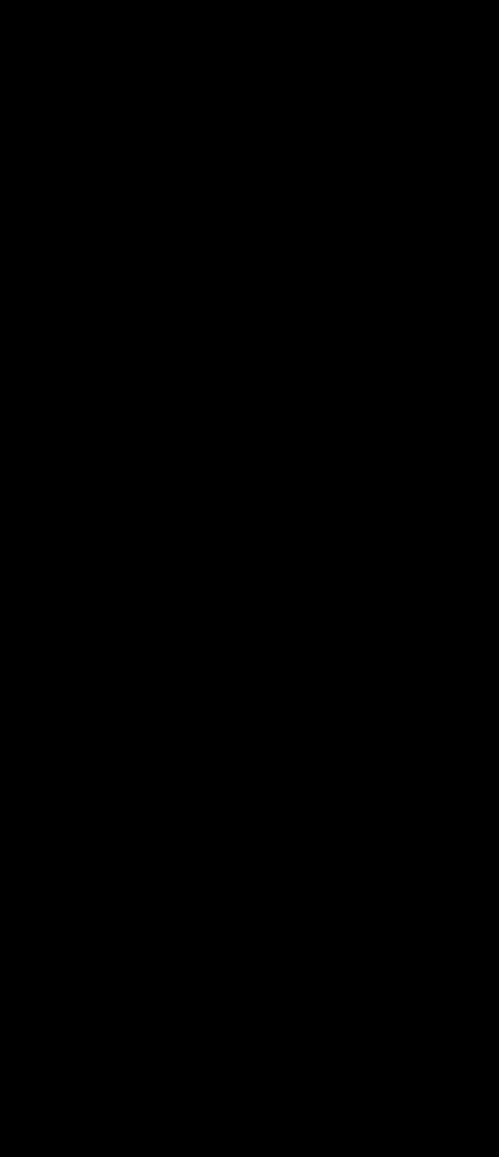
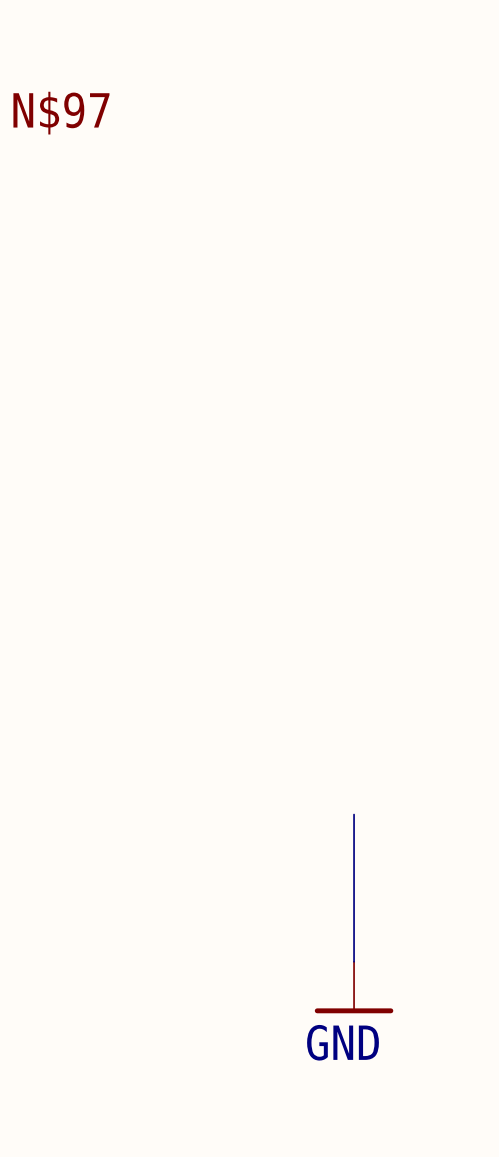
label: none -> N$97 (61, 113)
wire: none -> (354, 814) (354, 961)
power symbol: none -> GND (354, 987)

